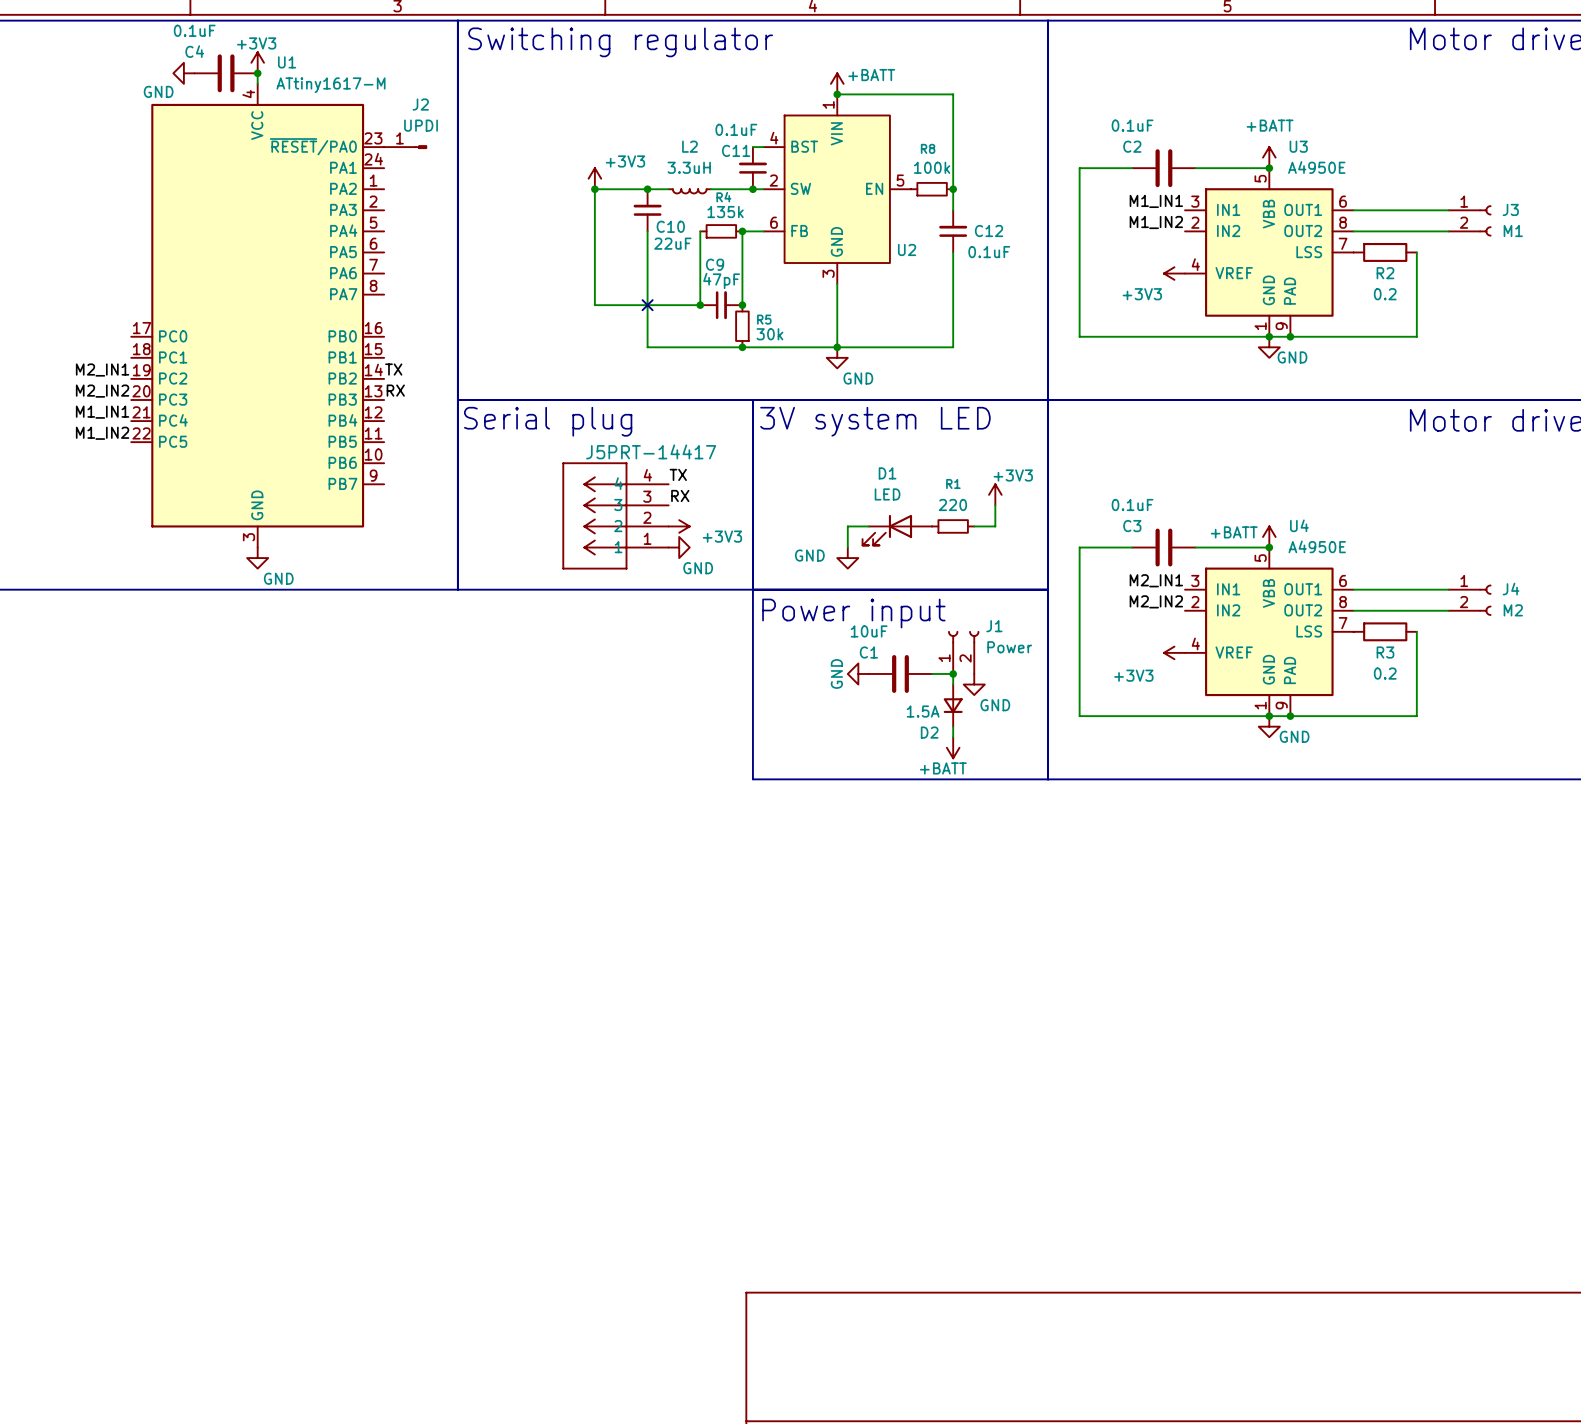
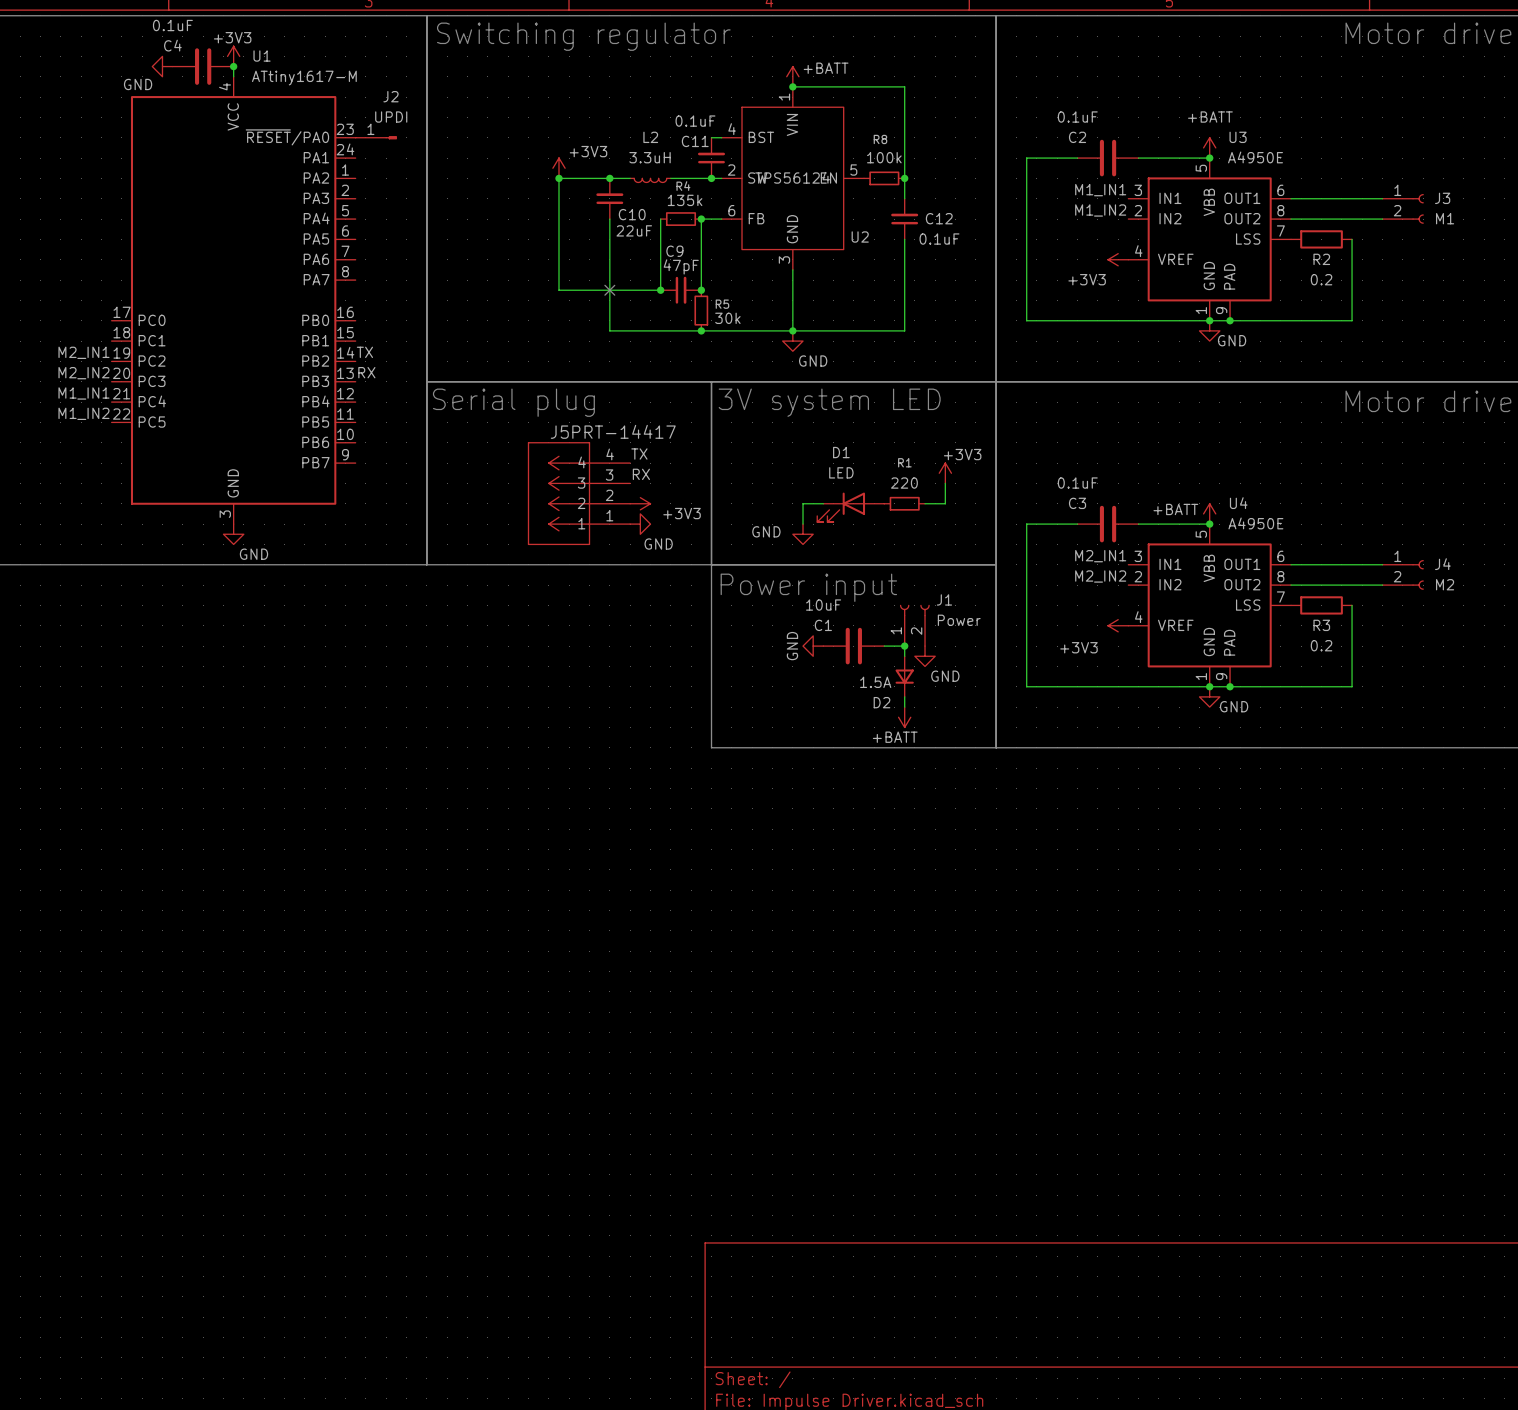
U2 value: none -> TPS56124 (792, 177)

